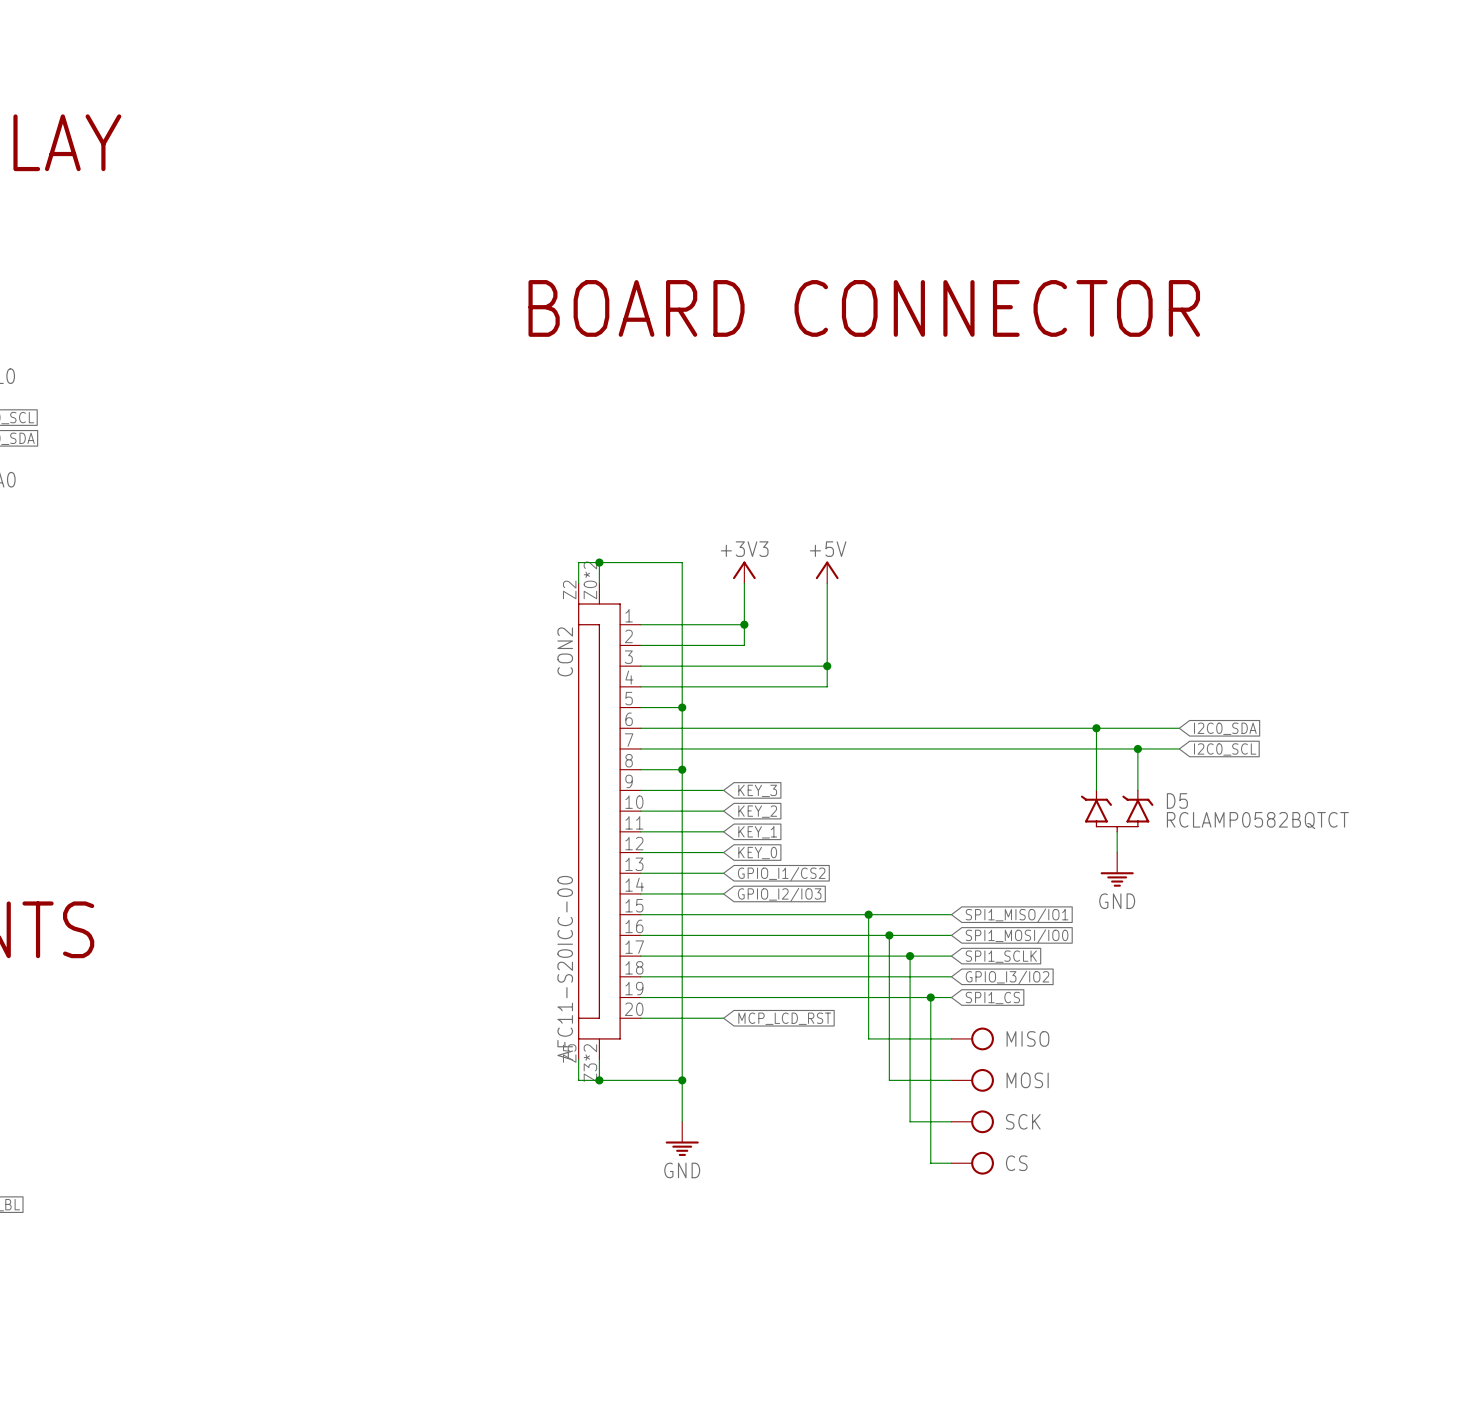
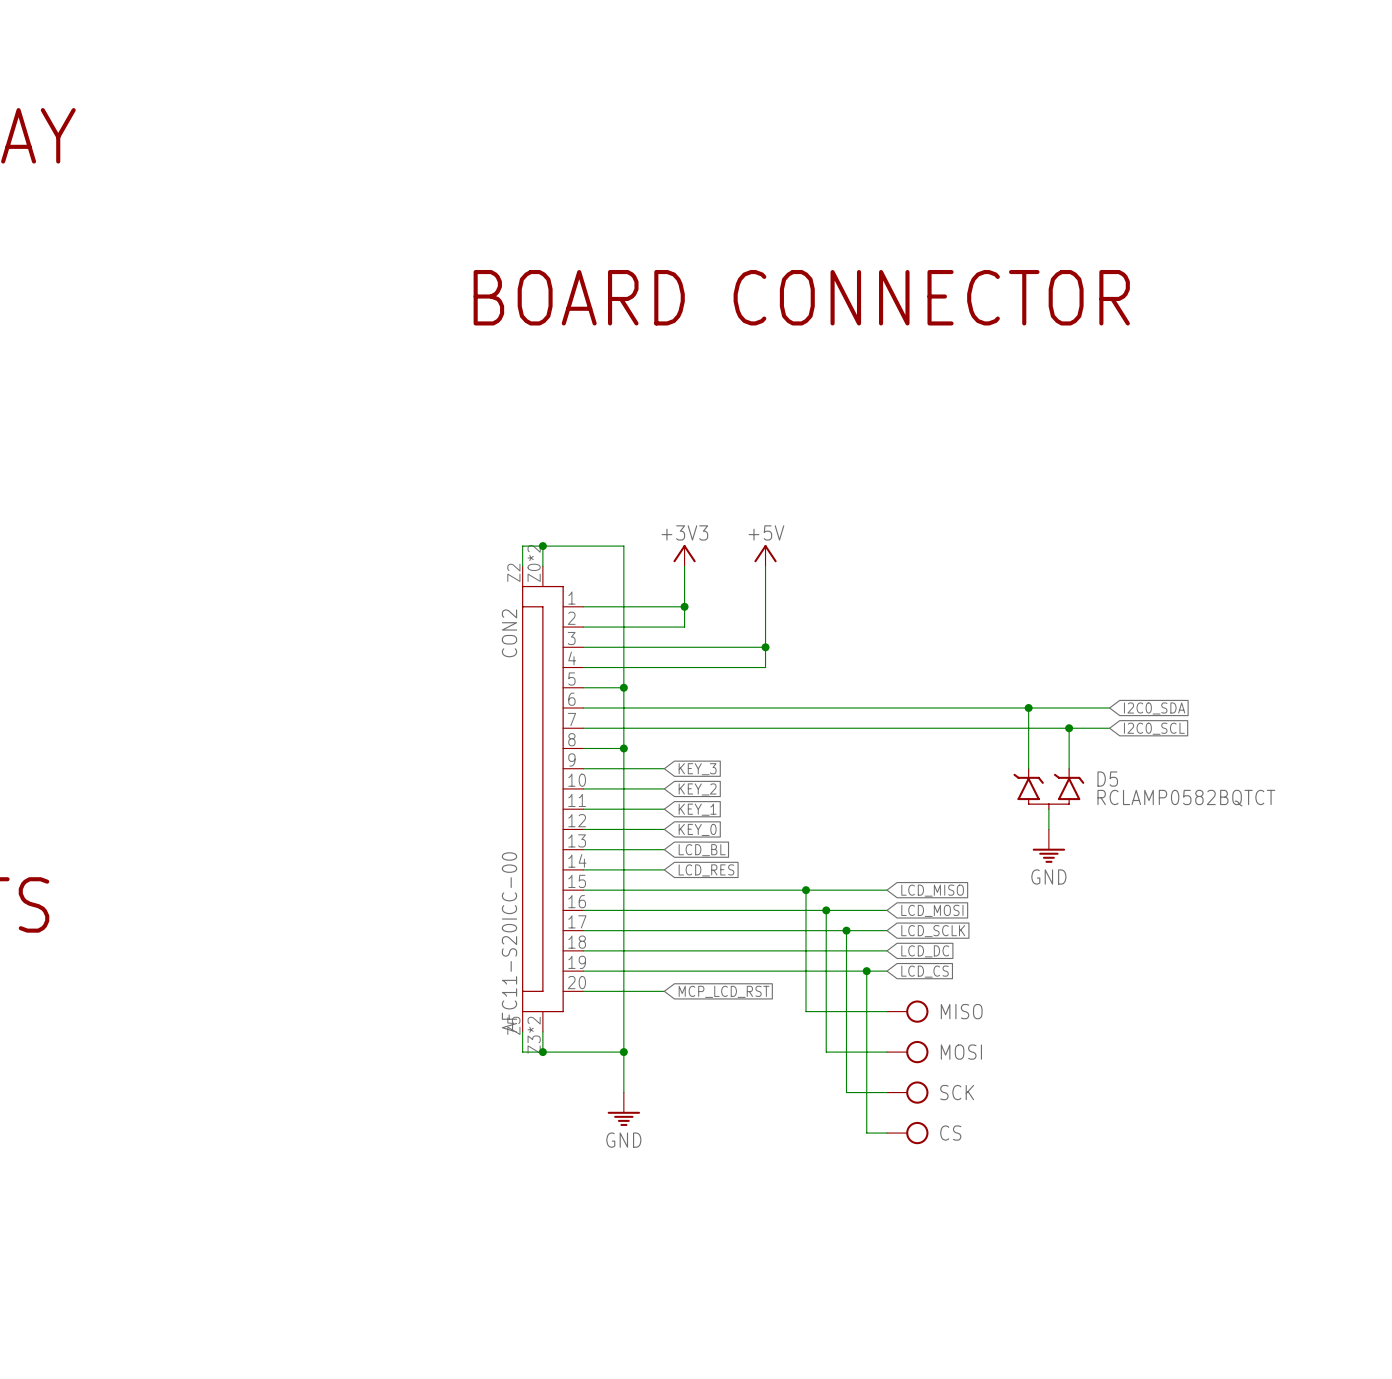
global label: GPIO_I1/CS2 (781, 874) -> LCD_BL (702, 850)
global label: GPIO_I2/IO3 (779, 894) -> LCD_RES (706, 870)
global label: SPI1_MISO/IO1 (1017, 915) -> LCD_MISO (932, 890)
global label: SPI1_MOSI/IO0 (1017, 936) -> LCD_MOSI (932, 910)
global label: SPI1_SCLK (1001, 956) -> LCD_SCLK (933, 931)
global label: GPIO_I3/IO2 (1007, 977) -> LCD_DC (925, 951)
global label: SPI1_CS (992, 998) -> LCD_CS (925, 971)

